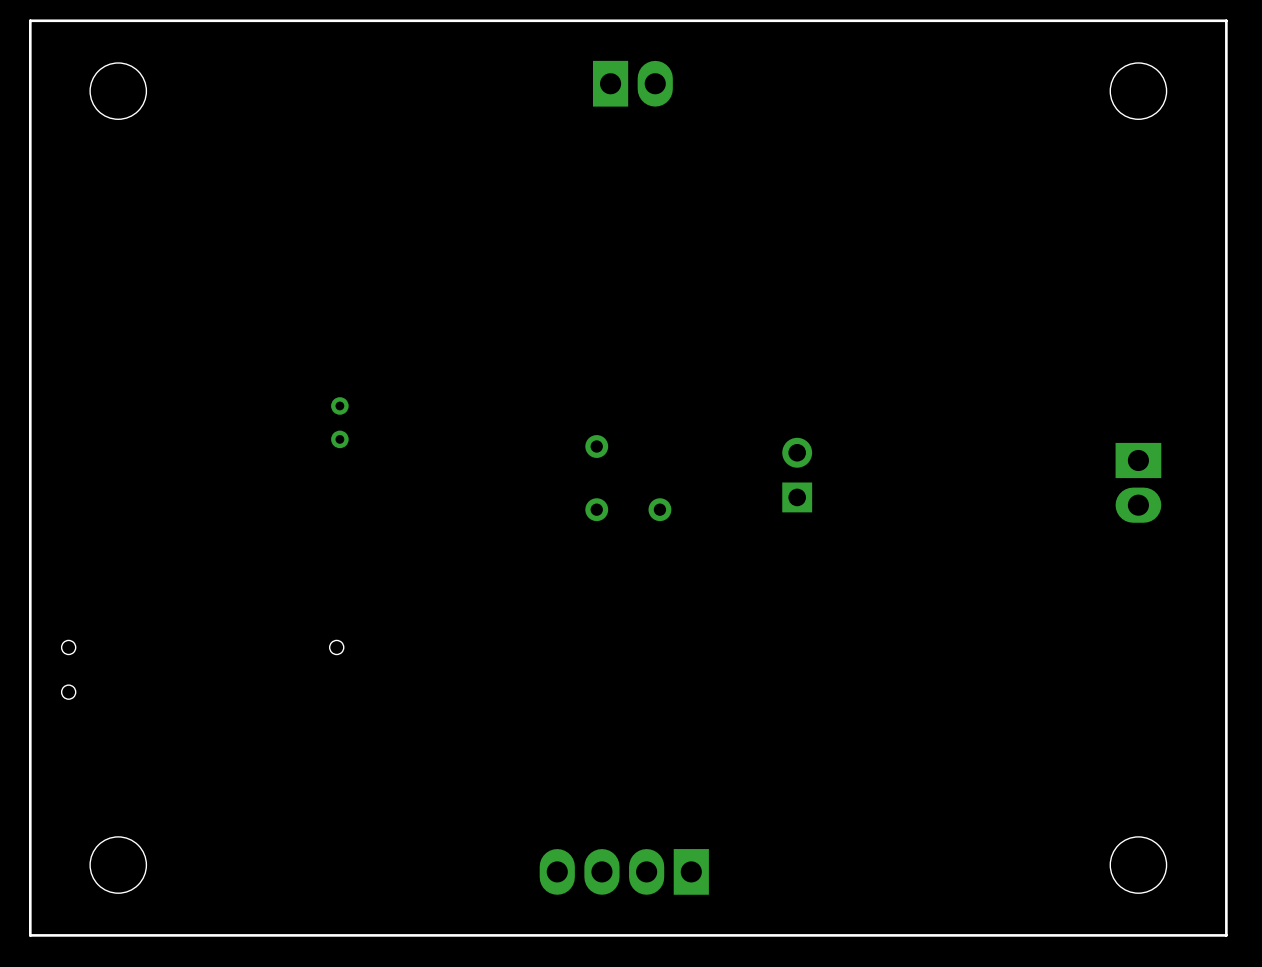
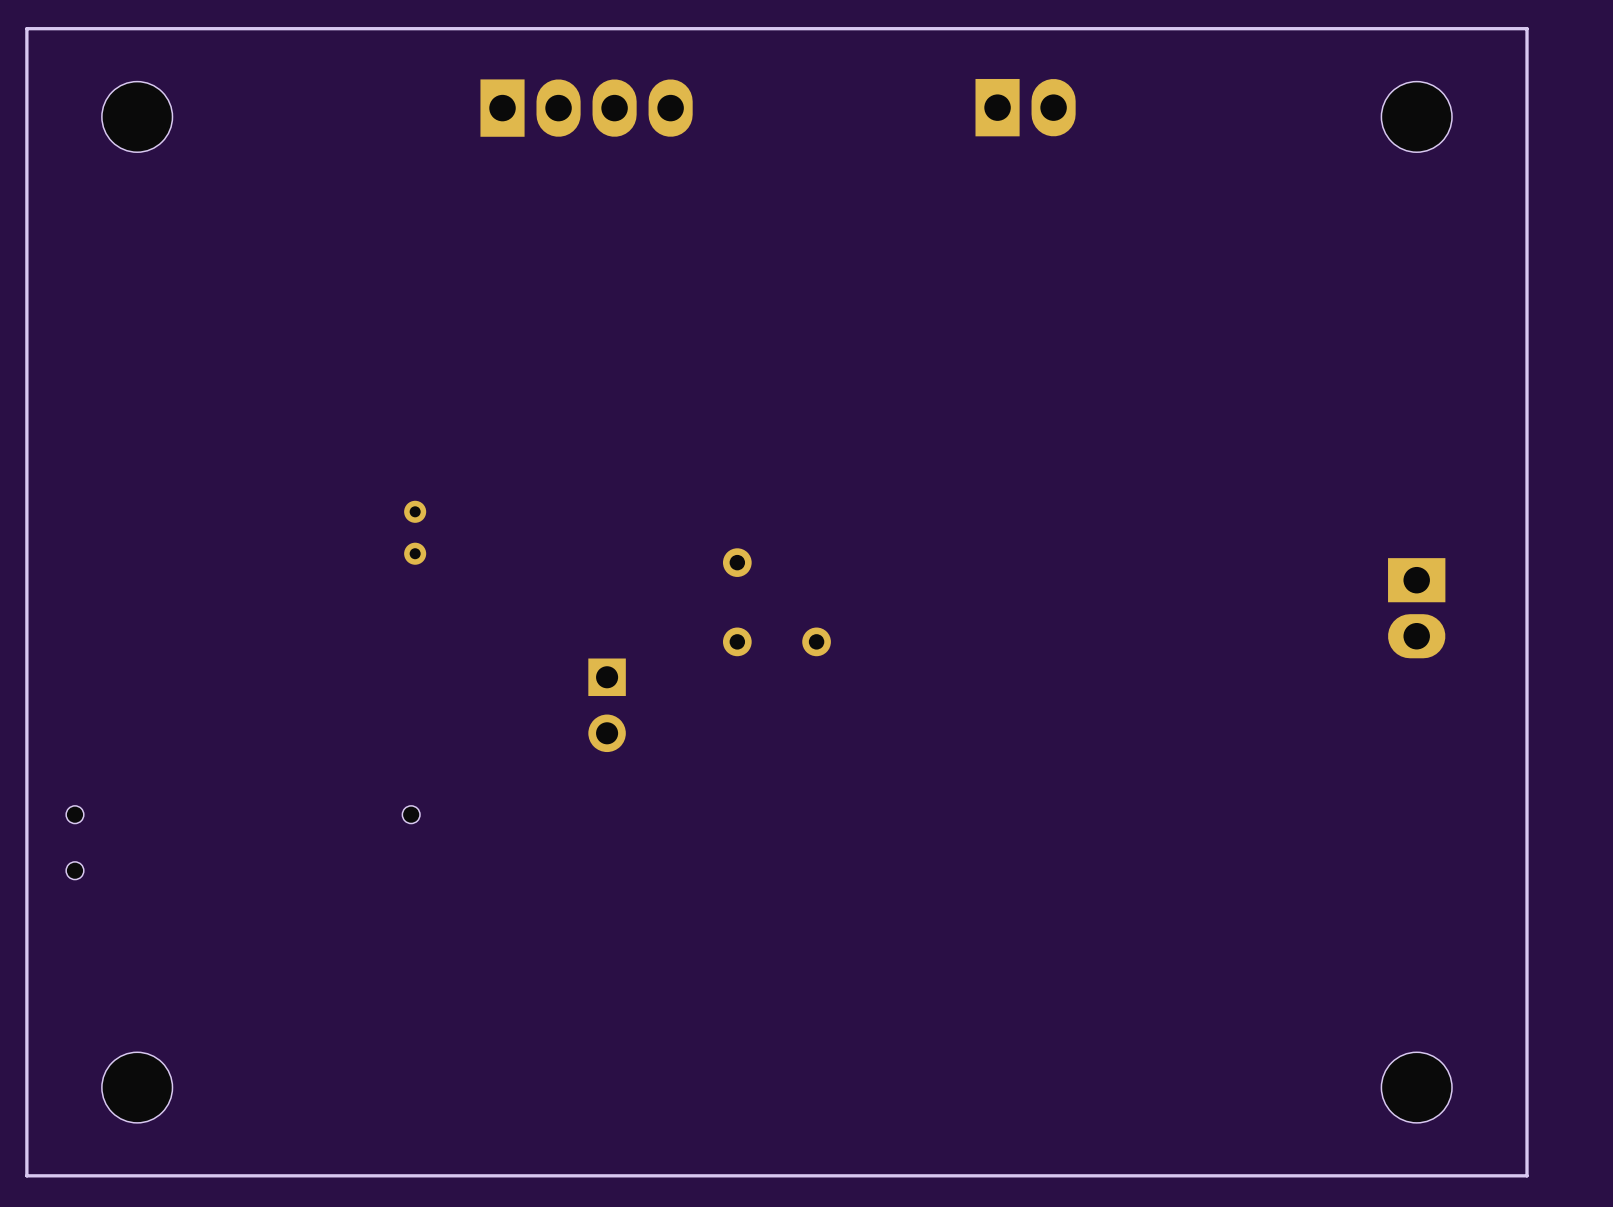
part position: (632, 83) -> (1025, 107)
part: none -> (586, 108)
part rotation: 0° (797, 475) -> 180° (607, 705)
part position: (797, 475) -> (607, 705)
part: (624, 871) -> none

